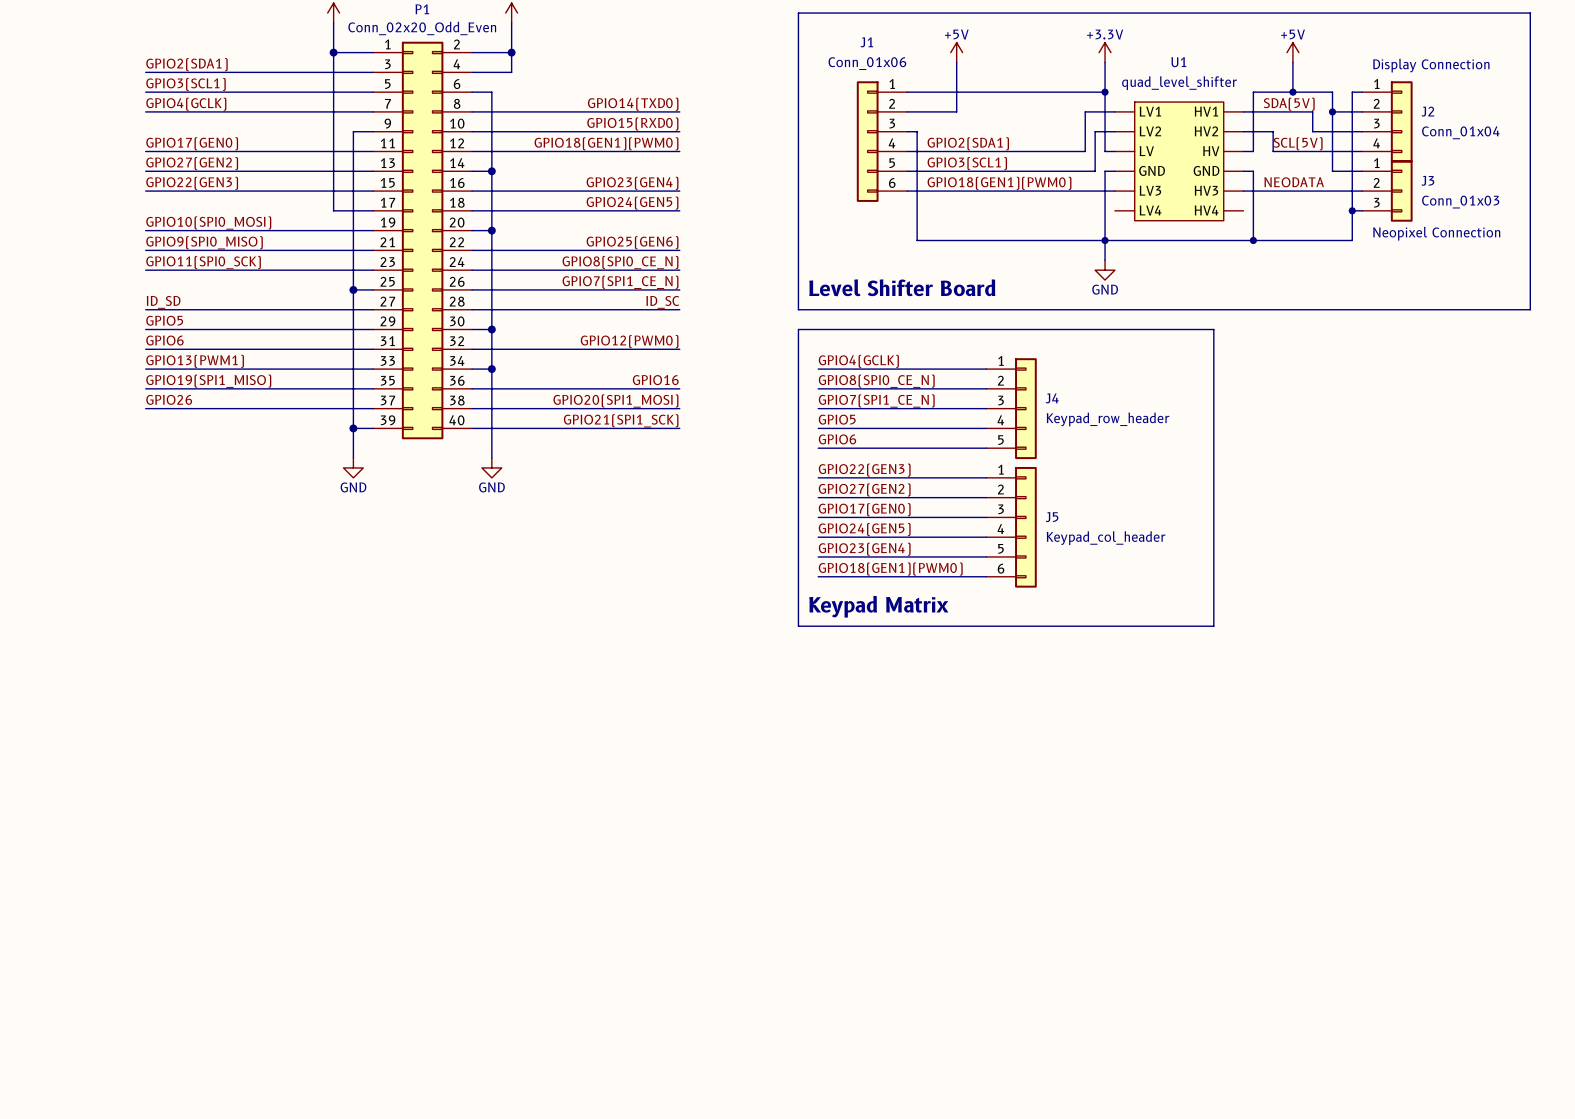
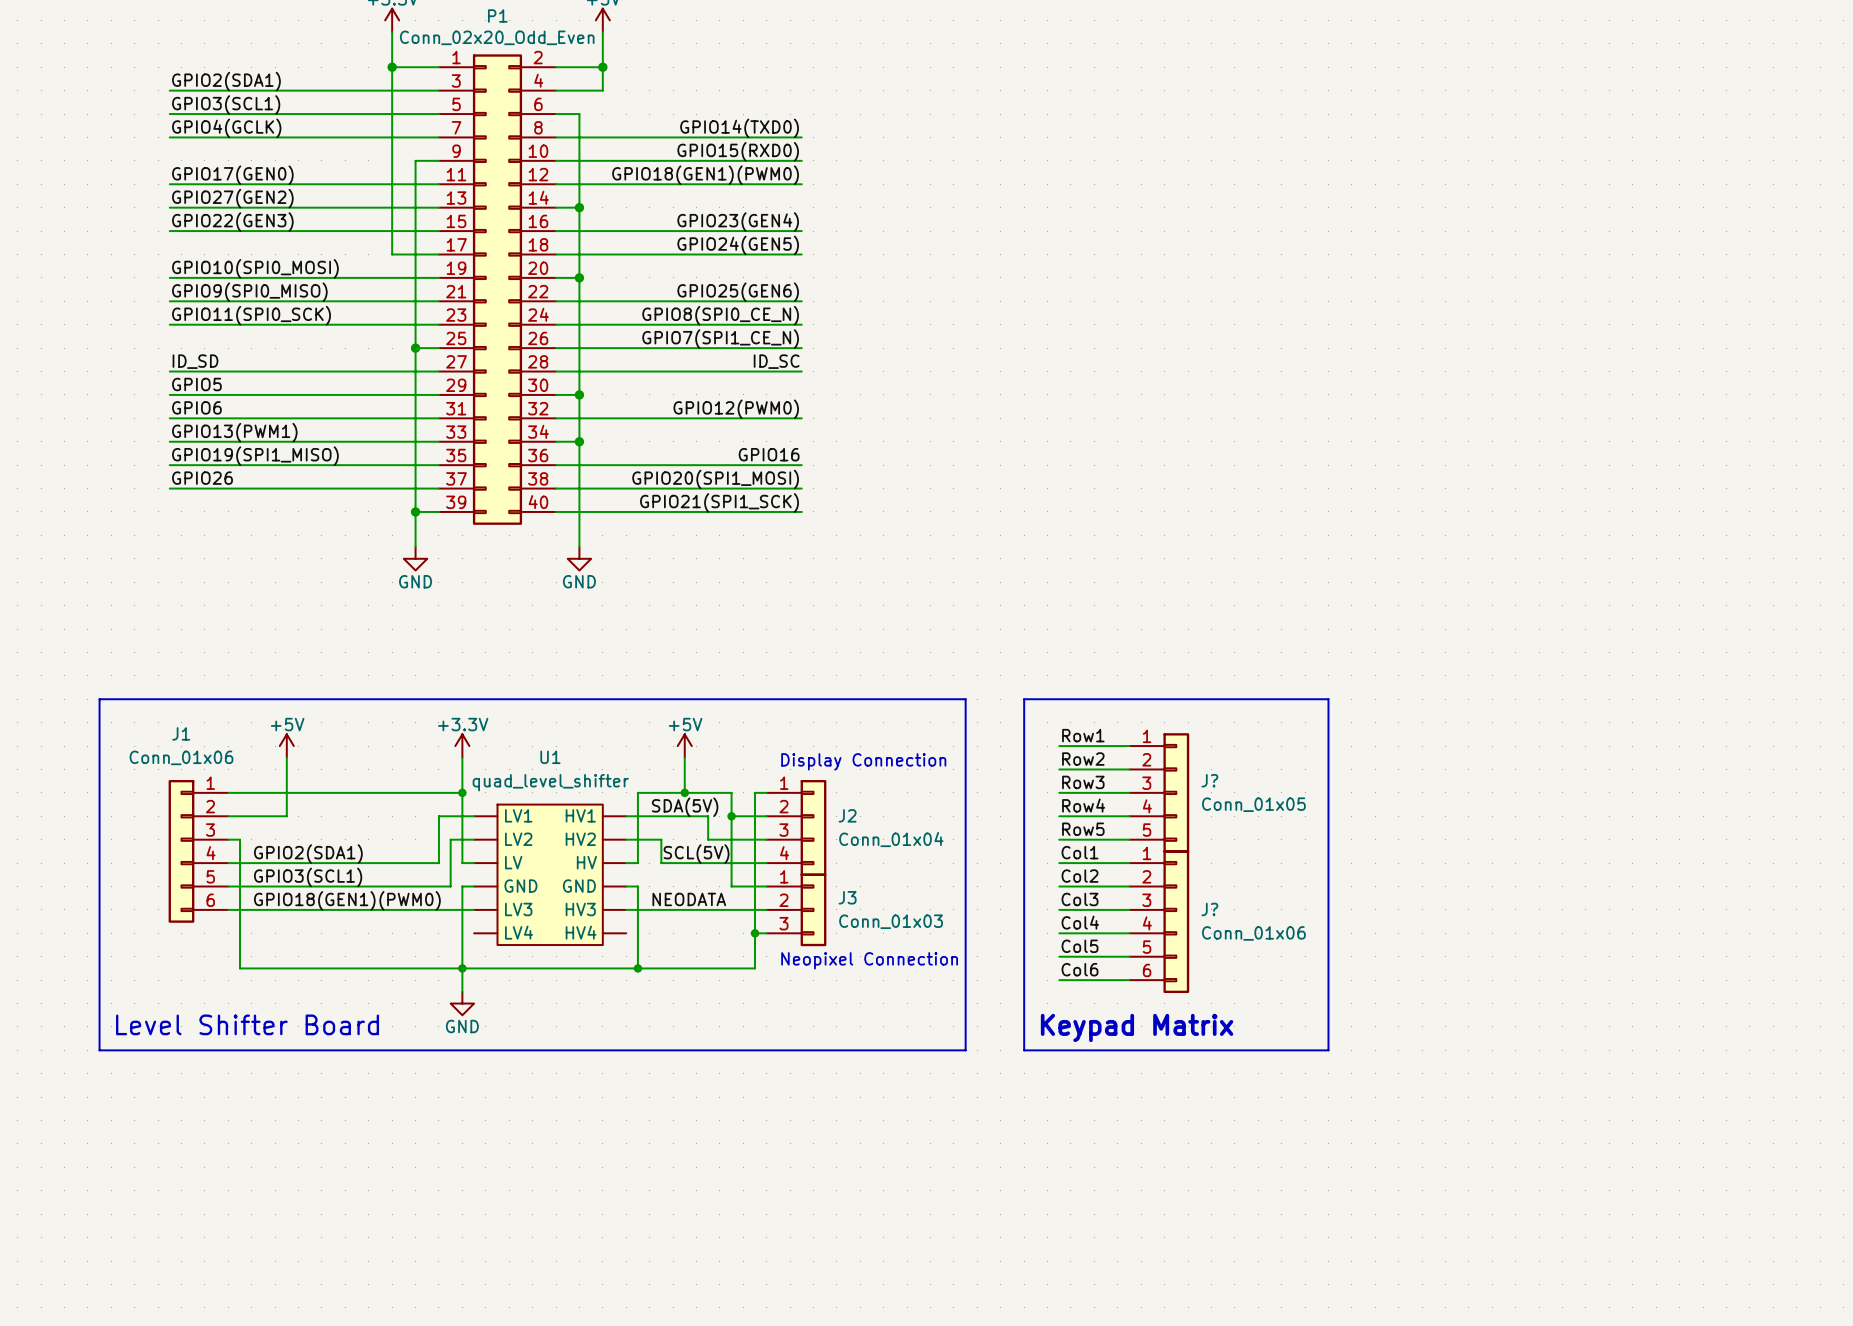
line: (798, 13) (1530, 13) (1530, 309) (798, 309) (798, 13) -> none
power symbol: +5V (956, 52) -> none
power symbol: +3.3V (1105, 52) -> none
power symbol: +5V (1292, 52) -> none
wire: (956, 62) (956, 111) (907, 111) -> none
wire: (1105, 62) (1105, 151) (1114, 151) -> none
wire: (1292, 62) (1292, 92) -> none
text: Display Connection (1431, 65) -> none
wire: (907, 92) (1105, 92) -> none
junction: (1105, 92) -> none
junction: (1292, 92) -> none
wire: (1362, 92) (1352, 92) (1352, 240) (917, 240) (917, 131) (907, 131) -> none
label: SDA(5V) (1289, 104) -> none
wire: (1114, 111) (1085, 111) (1085, 151) (907, 151) -> none
wire: (1243, 111) (1312, 111) (1312, 131) (1362, 131) -> none
wire: (1332, 111) (1362, 111) -> none
junction: (1332, 111) -> none
J2 position: (1387, 121) -> (796, 827)
wire: (1114, 131) (1095, 131) (1095, 171) (907, 171) -> none
wire: (1243, 131) (1273, 131) (1273, 151) (1362, 151) -> none
J1 position: (882, 141) -> (198, 851)
label: GPIO2(SDA1) (968, 143) -> none
label: SCL(5V) (1298, 143) -> none
wire: (1243, 151) (1253, 151) (1253, 92) (1332, 92) (1332, 171) (1362, 171) -> none
U1 position: (1179, 161) -> (550, 874)
label: GPIO3(SCL1) (967, 163) -> none
wire: (1114, 171) (1105, 171) (1105, 260) -> none
wire: (1243, 171) (1253, 171) (1253, 240) -> none
label: NEODATA (1294, 182) -> none
label: GPIO18(GEN1)(PWM0) (999, 183) -> none
wire: (907, 191) (1114, 191) -> none
wire: (1243, 191) (1362, 191) -> none
J3 position: (1387, 191) -> (796, 909)
wire: (1352, 210) (1362, 210) -> none
junction: (1352, 210) -> none
text: Neopixel Connection (1436, 233) -> none
junction: (1105, 240) -> none
junction: (1253, 240) -> none
power symbol: GND (1105, 270) -> none
text: Level Shifter Board (902, 287) -> none
line: (798, 329) (1213, 329) (1213, 626) (798, 626) (798, 329) -> none
label: GPIO4(GCLK) (858, 361) -> none
wire: (818, 369) (986, 369) -> none
label: GPIO8(SPI0_CE_N) (876, 381) -> none
wire: (818, 388) (986, 388) -> none
label: GPIO7(SPI1_CE_N) (876, 401) -> none
wire: (818, 408) (986, 408) -> none
J4: Keypad_row_header (1011, 408) -> none
label: GPIO5 (837, 419) -> none
wire: (818, 428) (986, 428) -> none
label: GPIO6 (837, 439) -> none
wire: (818, 448) (986, 448) -> none
label: GPIO22(GEN3) (864, 470) -> none
wire: (818, 477) (986, 477) -> none
label: GPIO27(GEN2) (864, 489) -> none
wire: (818, 497) (986, 497) -> none
label: GPIO17(GEN0) (864, 509) -> none
wire: (818, 517) (986, 517) -> none
J5: Keypad_col_header (1011, 527) -> none
label: GPIO24(GEN5) (864, 529) -> none
wire: (818, 537) (986, 537) -> none
label: GPIO23(GEN4) (864, 549) -> none
wire: (818, 556) (986, 556) -> none
label: GPIO18(GEN1)(PWM0) (890, 569) -> none
wire: (818, 576) (986, 576) -> none
line: none -> (99, 699) (965, 699) (965, 1050) (99, 1050) (99, 699)
line: none -> (1024, 699) (1328, 699) (1328, 1050) (1024, 1050) (1024, 699)
text: Keypad Matrix (878, 606) -> none
label: none -> Row1 (1083, 735)
power symbol: none -> +5V (286, 746)
power symbol: none -> +3.3V (462, 746)
power symbol: none -> +5V (684, 746)
wire: none -> (286, 757) (286, 816) (228, 816)
wire: none -> (462, 757) (462, 863) (474, 863)
wire: none -> (684, 757) (684, 792)
label: none -> Row2 (1083, 759)
text: none -> Display Connection (863, 761)
wire: none -> (1059, 769) (1129, 769)
label: none -> Row3 (1083, 782)
wire: none -> (228, 792) (462, 792)
junction: none -> (462, 792)
junction: none -> (684, 792)
wire: none -> (766, 792) (754, 792) (754, 968) (240, 968) (240, 839) (228, 839)
wire: none -> (1059, 792) (1129, 792)
J?: none -> Conn_01x05 (1159, 792)
label: none -> Row4 (1083, 805)
label: none -> SDA(5V) (685, 807)
wire: none -> (474, 816) (438, 816) (438, 863) (228, 863)
wire: none -> (626, 816) (708, 816) (708, 839) (766, 839)
wire: none -> (731, 816) (766, 816)
junction: none -> (731, 816)
wire: none -> (1059, 816) (1129, 816)
label: none -> Row5 (1083, 829)
wire: none -> (474, 839) (450, 839) (450, 886) (228, 886)
wire: none -> (626, 839) (661, 839) (661, 863) (766, 863)
wire: none -> (1059, 839) (1129, 839)
label: none -> Col1 (1080, 852)
label: none -> GPIO2(SDA1) (308, 854)
label: none -> SCL(5V) (696, 854)
wire: none -> (626, 863) (637, 863) (637, 792) (731, 792) (731, 886) (766, 886)
wire: none -> (1059, 863) (1129, 863)
label: none -> Col2 (1080, 876)
label: none -> GPIO3(SCL1) (308, 877)
wire: none -> (474, 886) (462, 886) (462, 991)
wire: none -> (626, 886) (637, 886) (637, 968)
wire: none -> (1059, 886) (1129, 886)
label: none -> NEODATA (689, 899)
label: none -> Col3 (1080, 899)
label: none -> GPIO18(GEN1)(PWM0) (347, 900)
wire: none -> (228, 909) (474, 909)
wire: none -> (626, 909) (766, 909)
wire: none -> (1059, 909) (1129, 909)
J?: none -> Conn_01x06 (1159, 921)
label: none -> Col4 (1080, 922)
wire: none -> (754, 933) (766, 933)
junction: none -> (754, 933)
wire: none -> (1059, 933) (1129, 933)
label: none -> Col5 (1080, 946)
wire: none -> (1059, 956) (1129, 956)
text: none -> Neopixel Connection (869, 960)
junction: none -> (462, 968)
junction: none -> (637, 968)
label: none -> Col6 (1080, 969)
wire: none -> (1059, 980) (1129, 980)
power symbol: none -> GND (462, 1003)
text: none -> Level Shifter Board (247, 1024)
text: none -> Keypad Matrix (1137, 1027)

